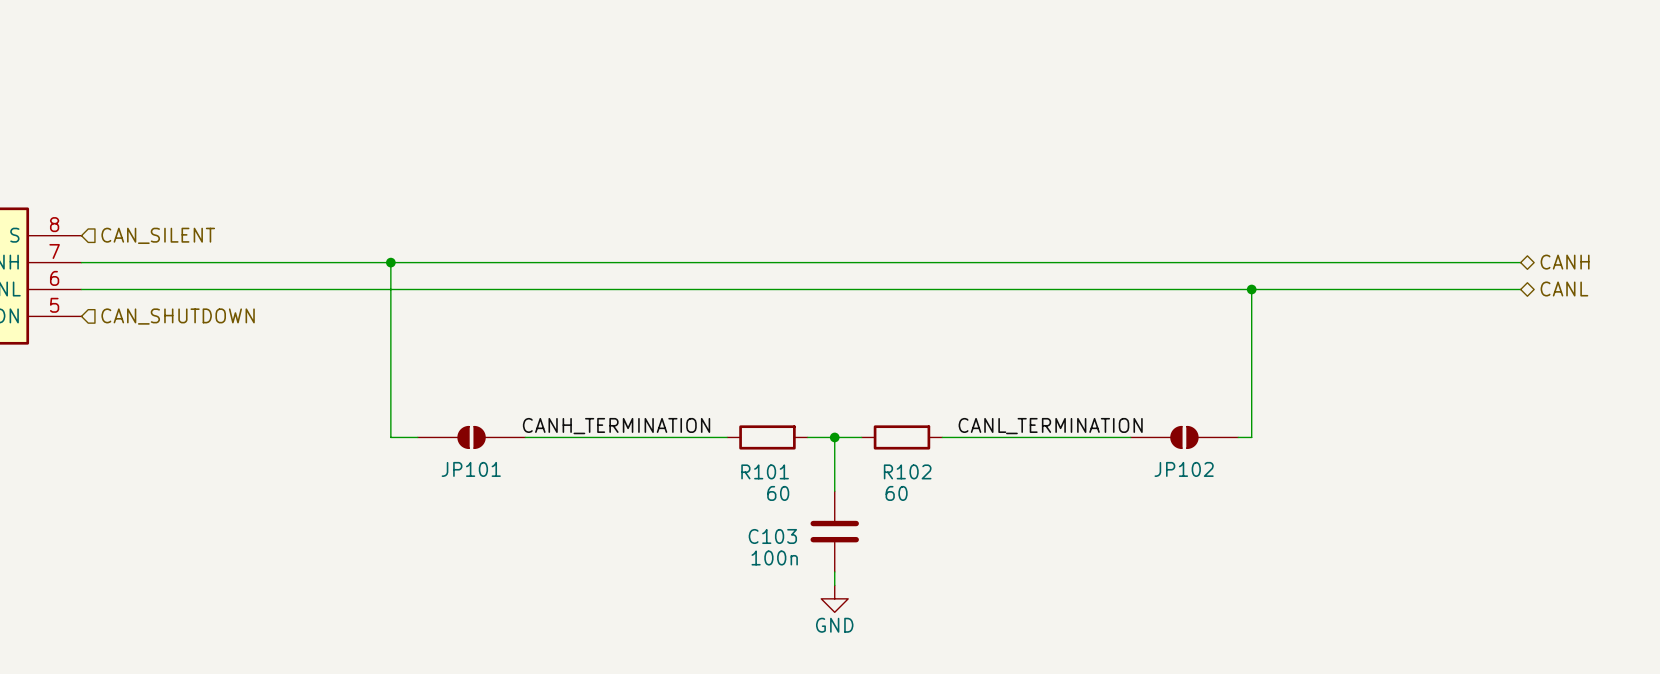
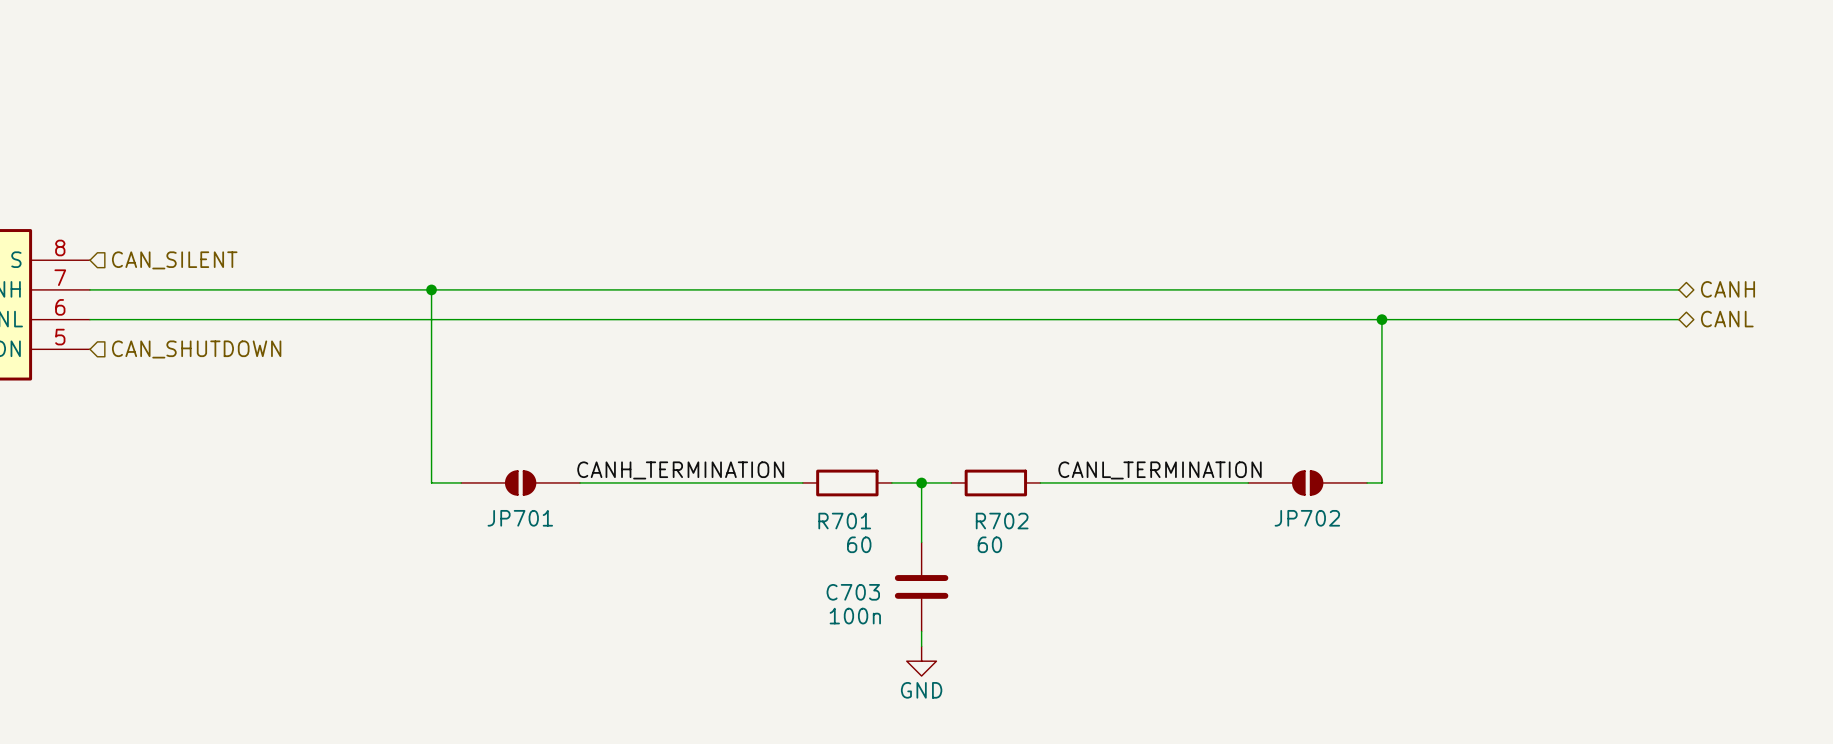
JP101 name: JP101 (471, 469) -> JP701 (520, 518)
JP102 name: JP102 (1184, 469) -> JP702 (1307, 518)
R101 name: R101 (765, 471) -> R701 (844, 521)
R102 name: R102 (907, 471) -> R702 (1002, 521)
C103 name: C103 (772, 536) -> C703 (853, 592)

